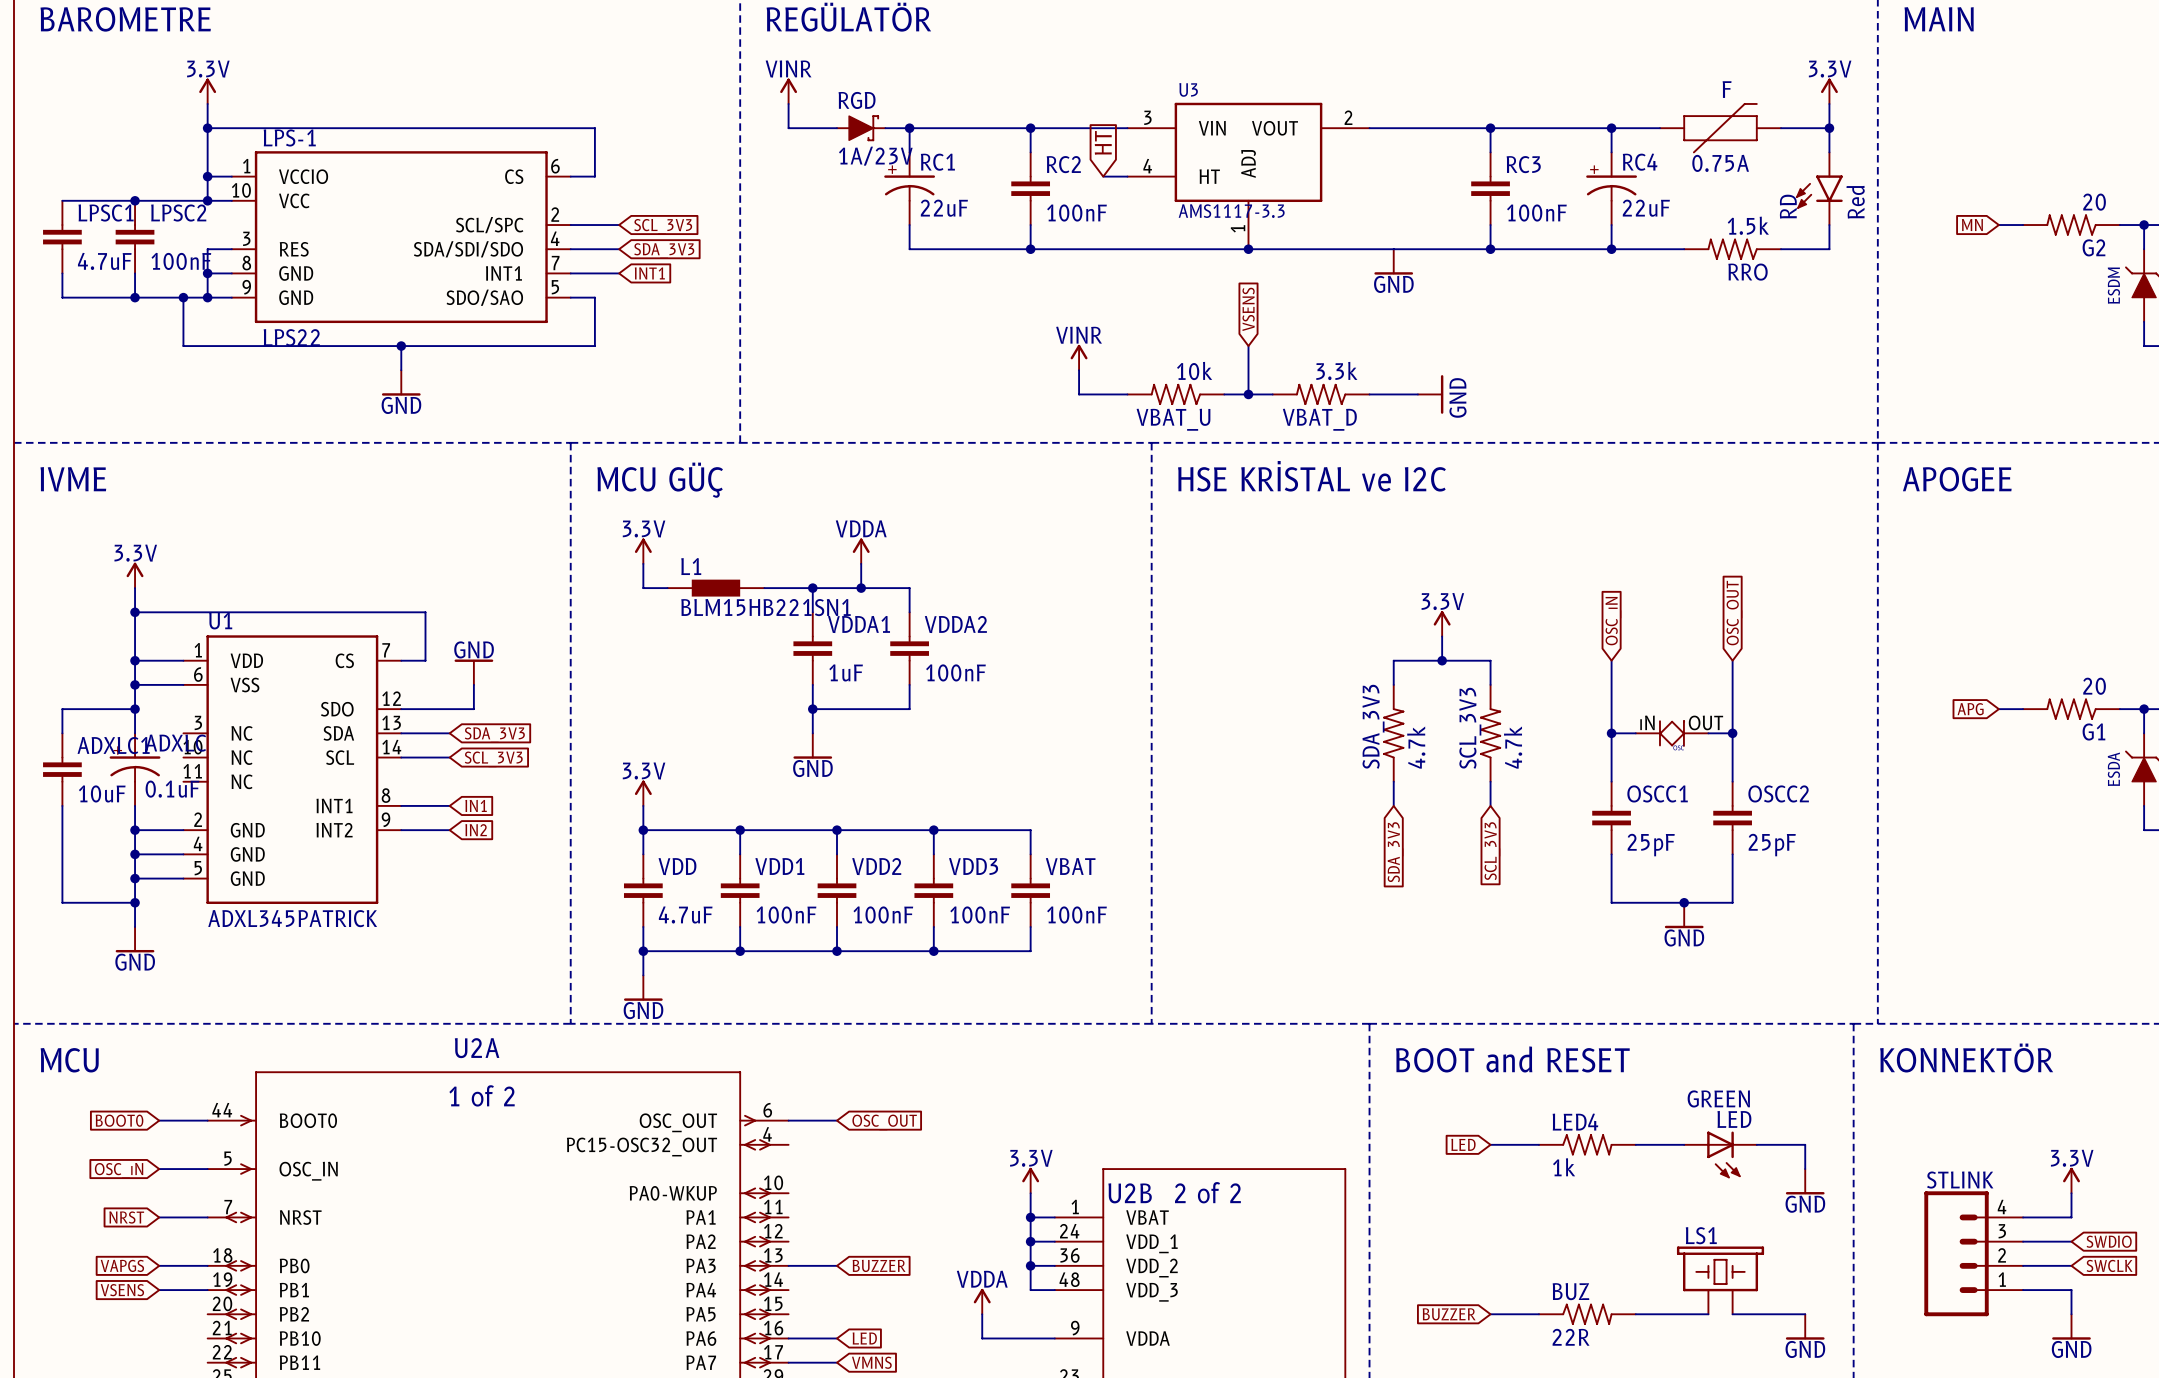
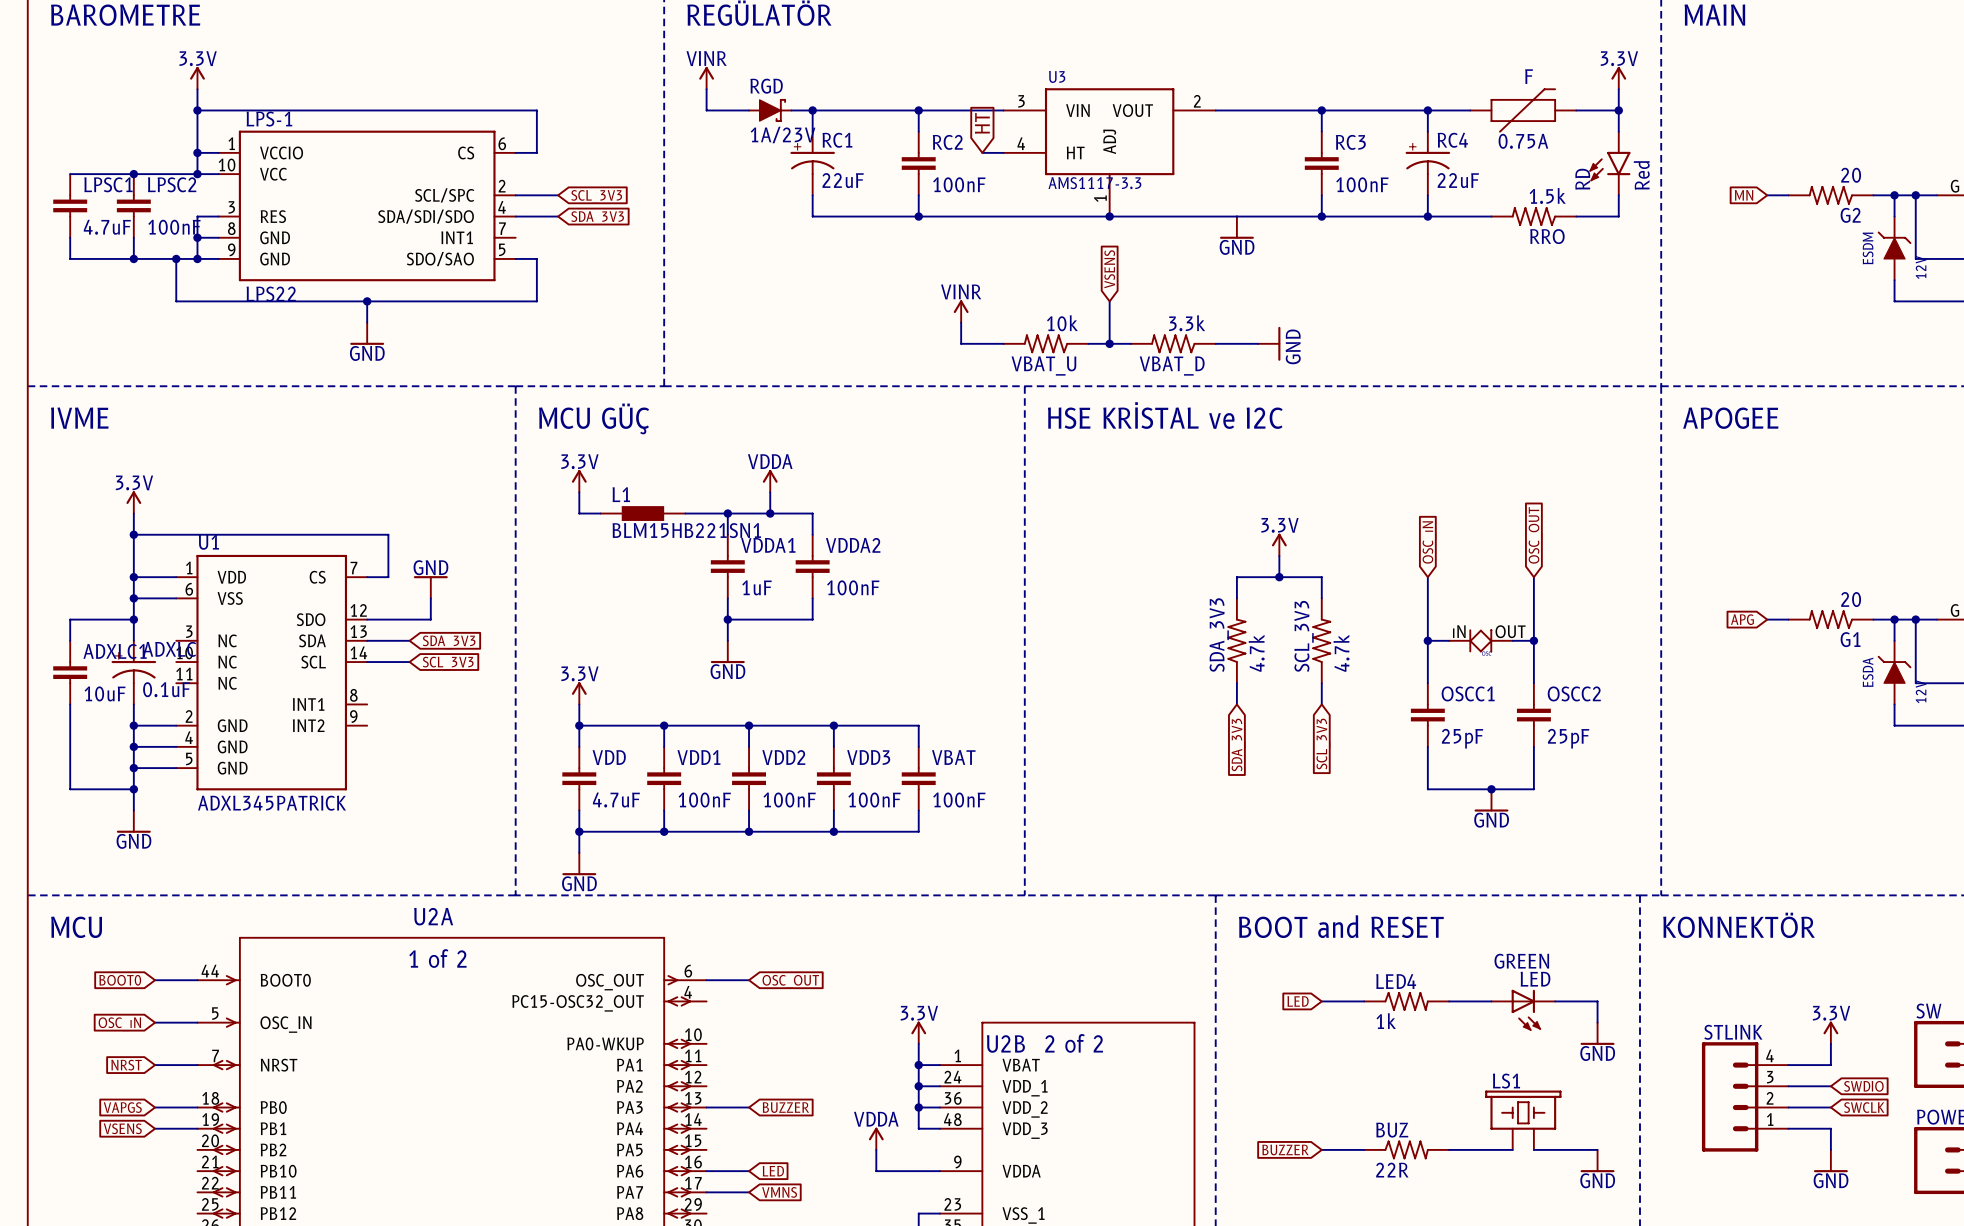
wire: (570, 273) (619, 273) -> none
global label: INT1 (649, 273) -> none
wire: (401, 805) (449, 805) -> none
global label: IN1 (476, 805) -> none
wire: (401, 830) (449, 830) -> none
global label: IN2 (476, 830) -> none

